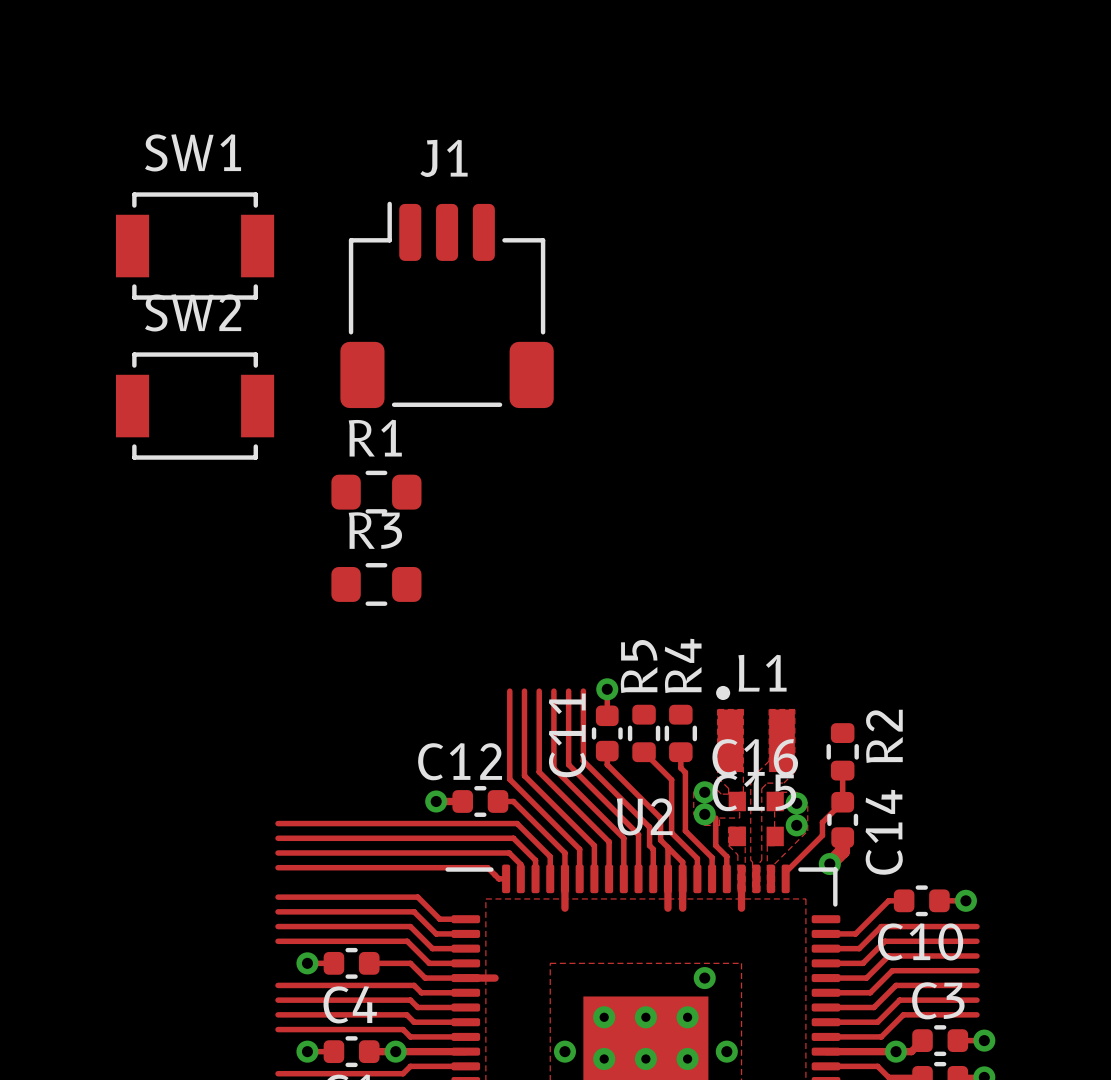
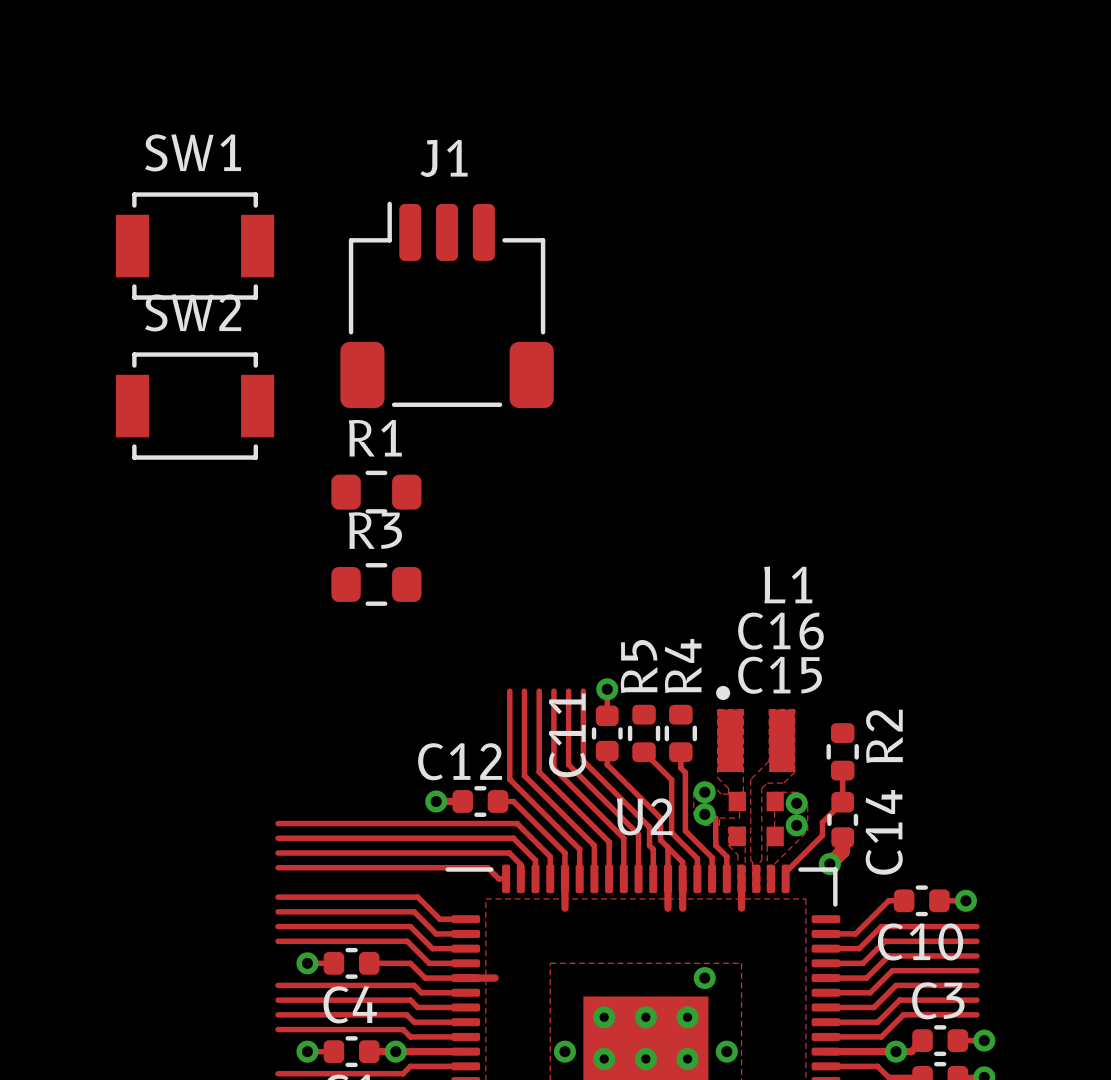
L1 name position: L1 (762, 673) -> L1 (788, 584)
C16 name position: C16 (755, 757) -> C16 (780, 631)
C15 name position: C15 (754, 792) -> C15 (780, 675)

